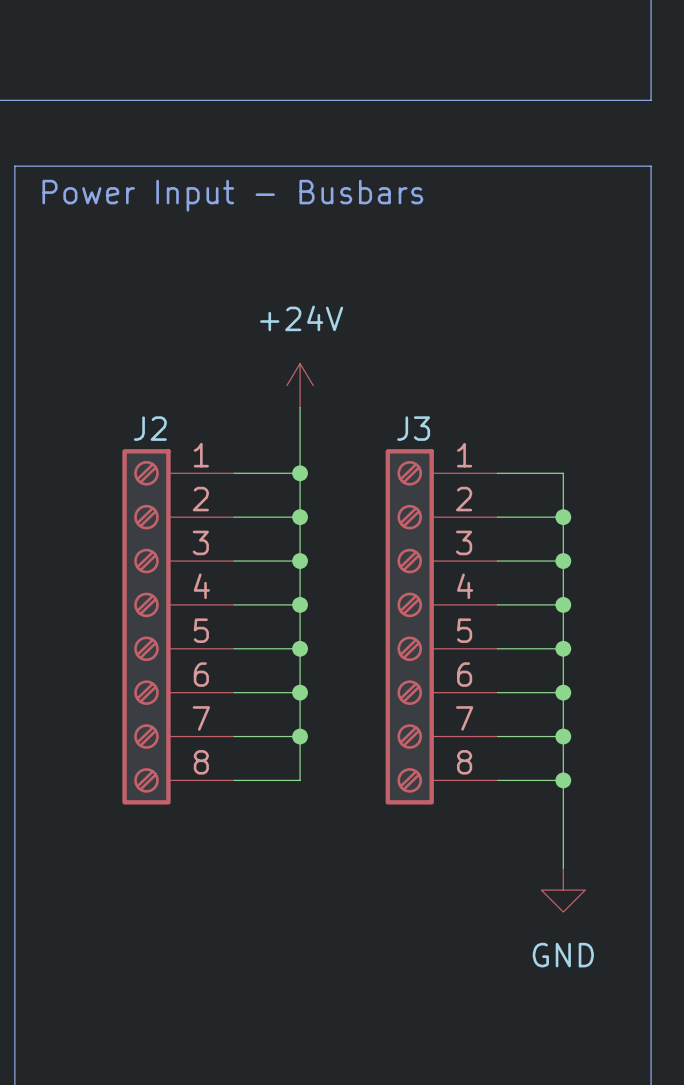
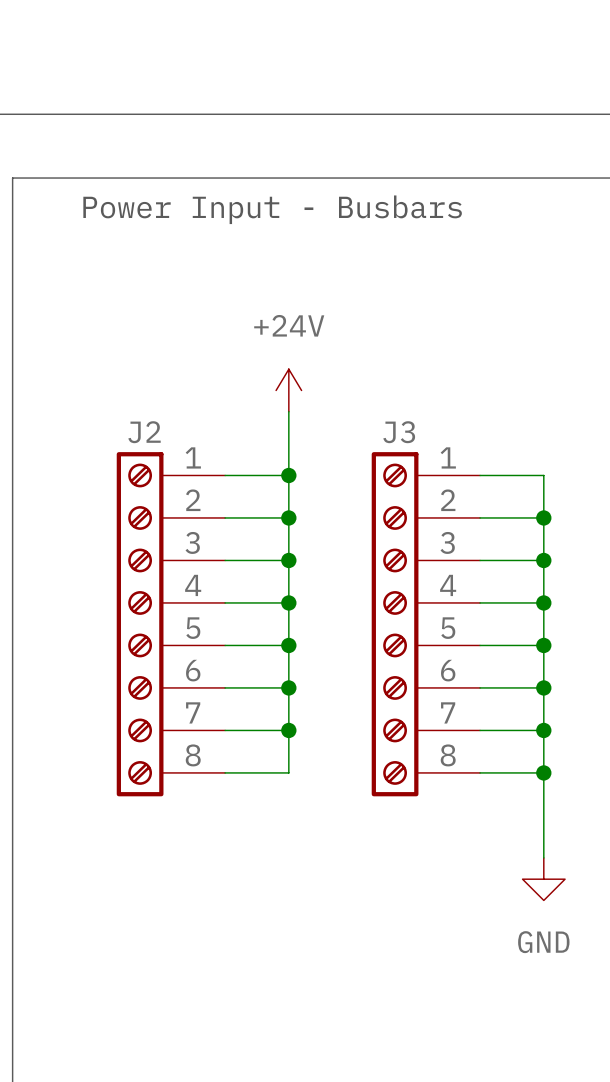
text position: Power Input - Busbars (232, 195) -> Power Input - Busbars (272, 209)

